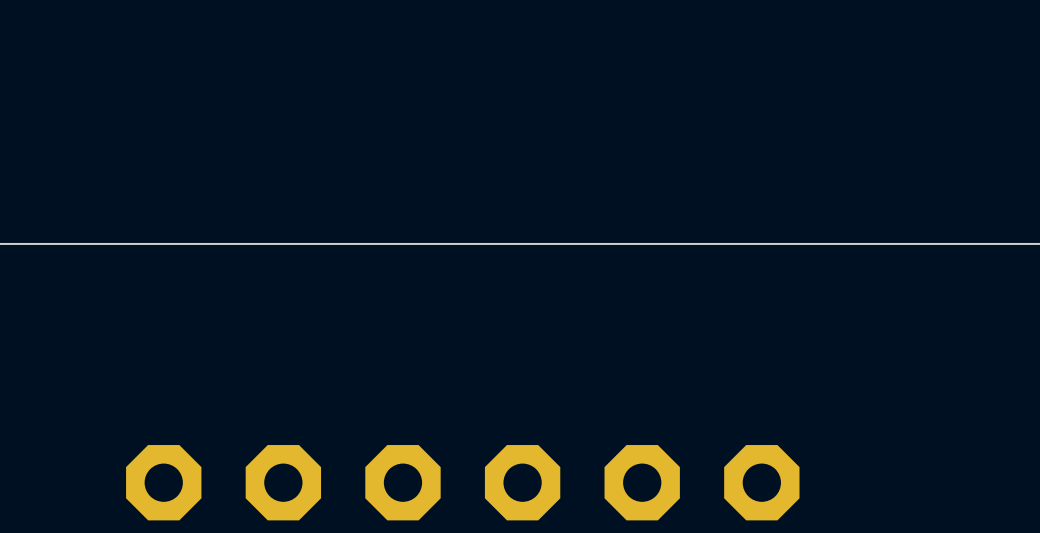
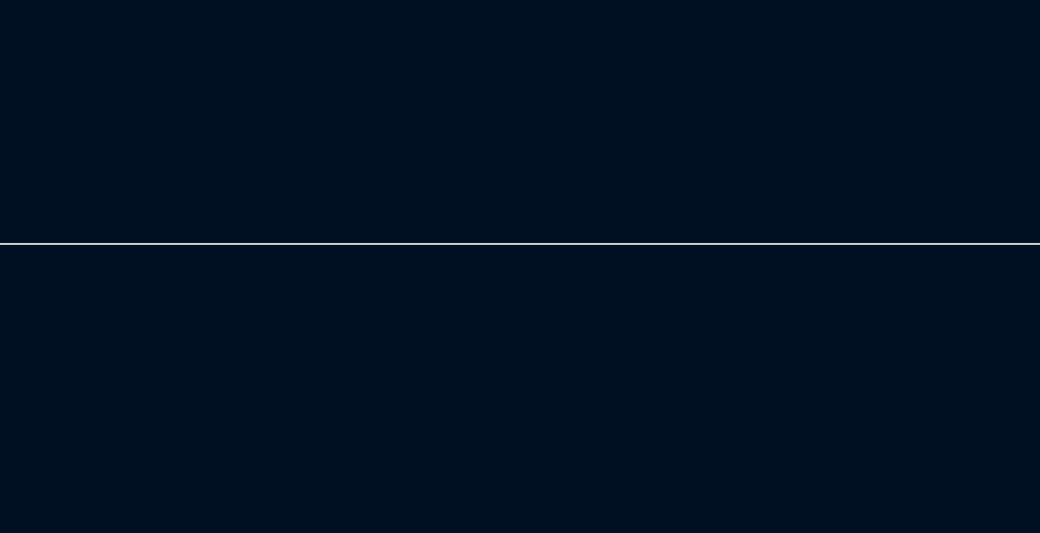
part: (163, 482) -> none
part: (283, 482) -> none
part: (402, 482) -> none
part: (522, 482) -> none
part: (642, 482) -> none
part: (761, 482) -> none

